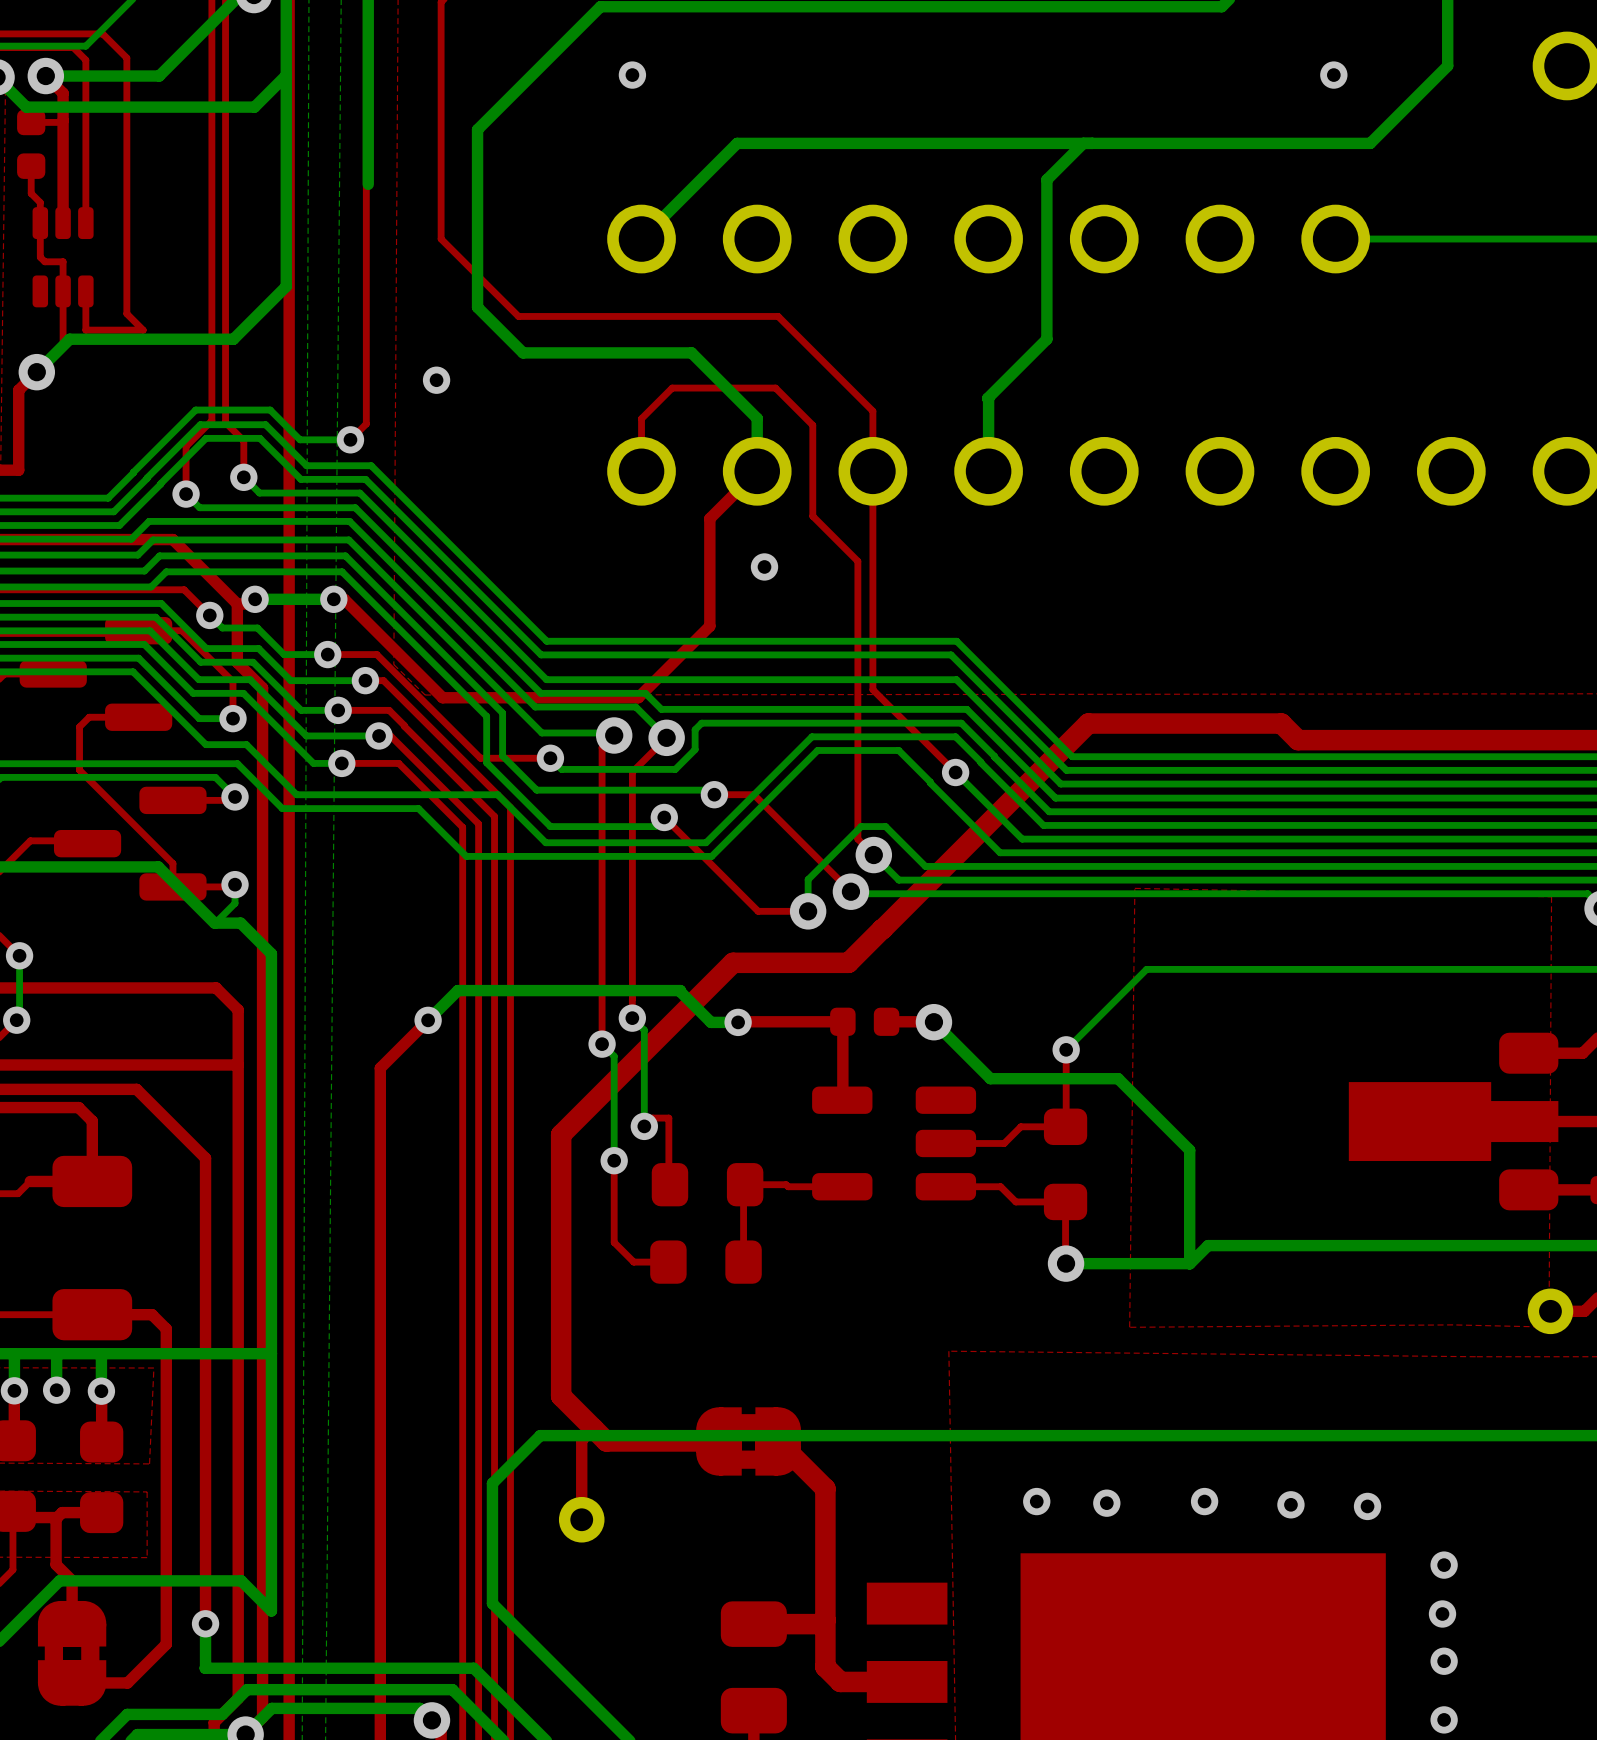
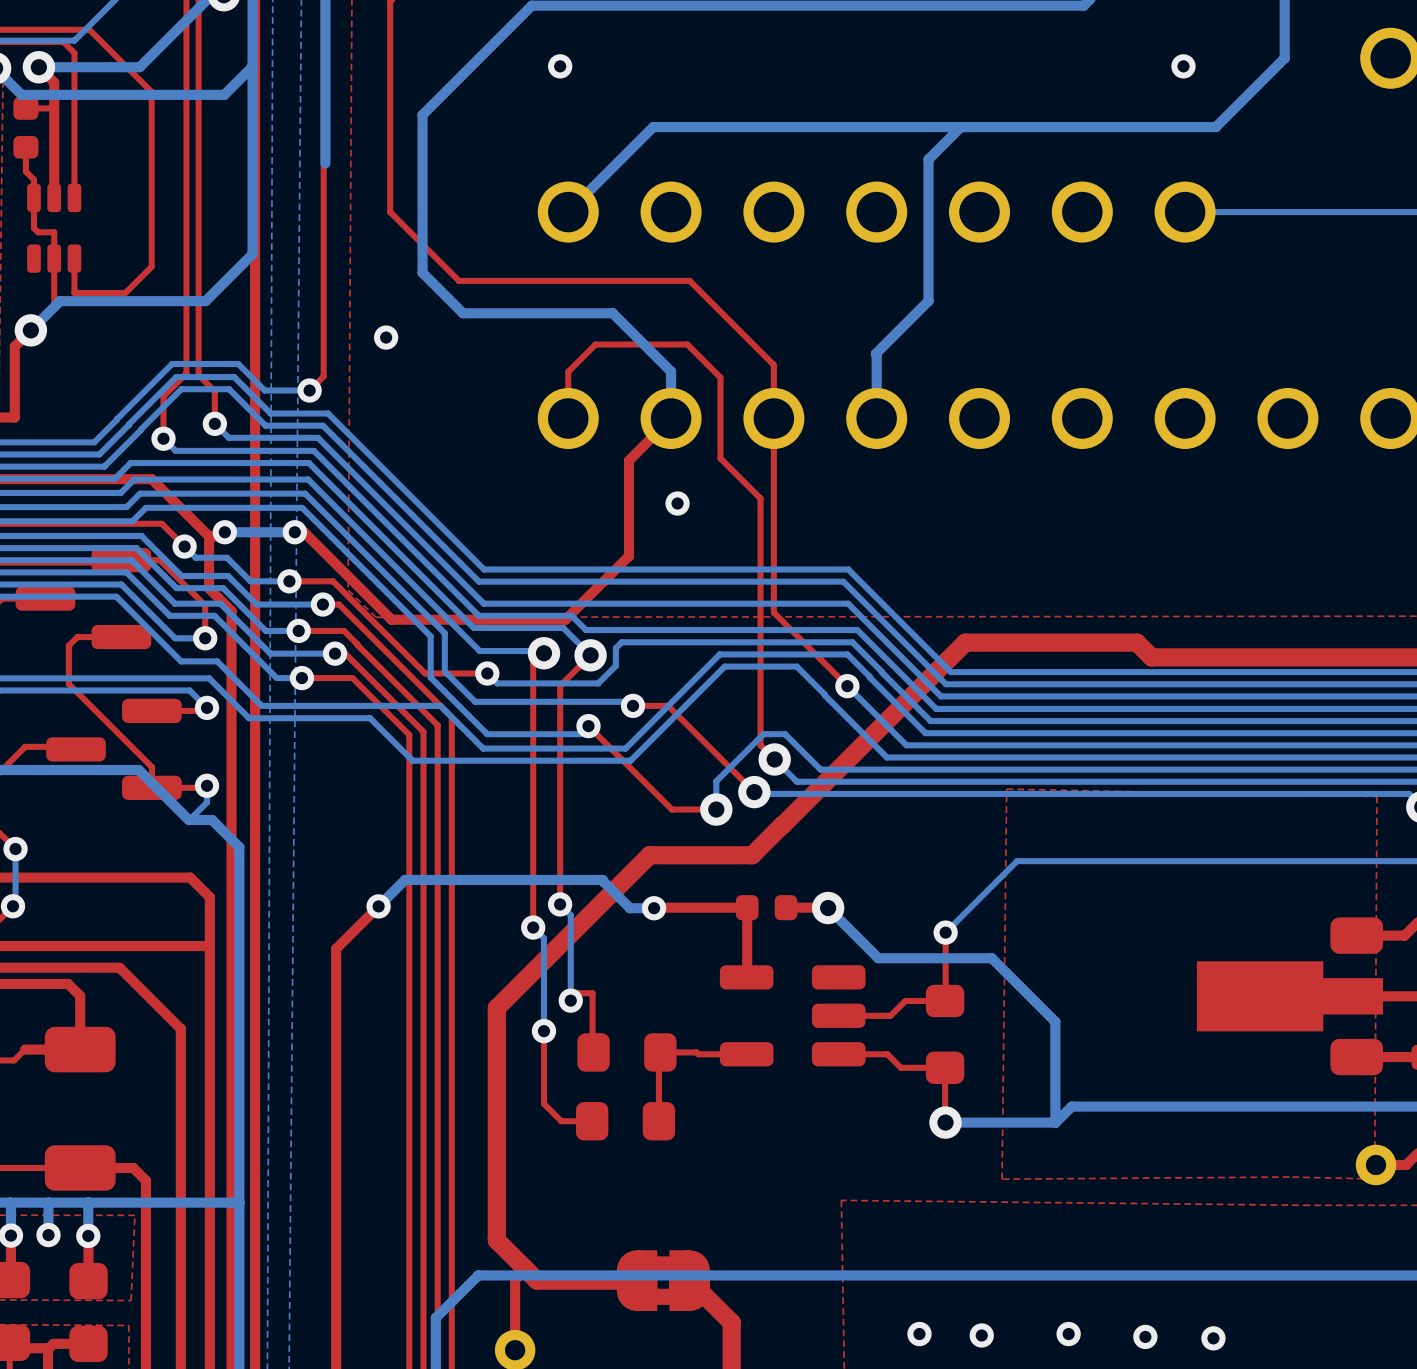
top track: (126, 58) (126, 313) (143, 330) -> (110, 51) (151, 92) (151, 266) (125, 293)

